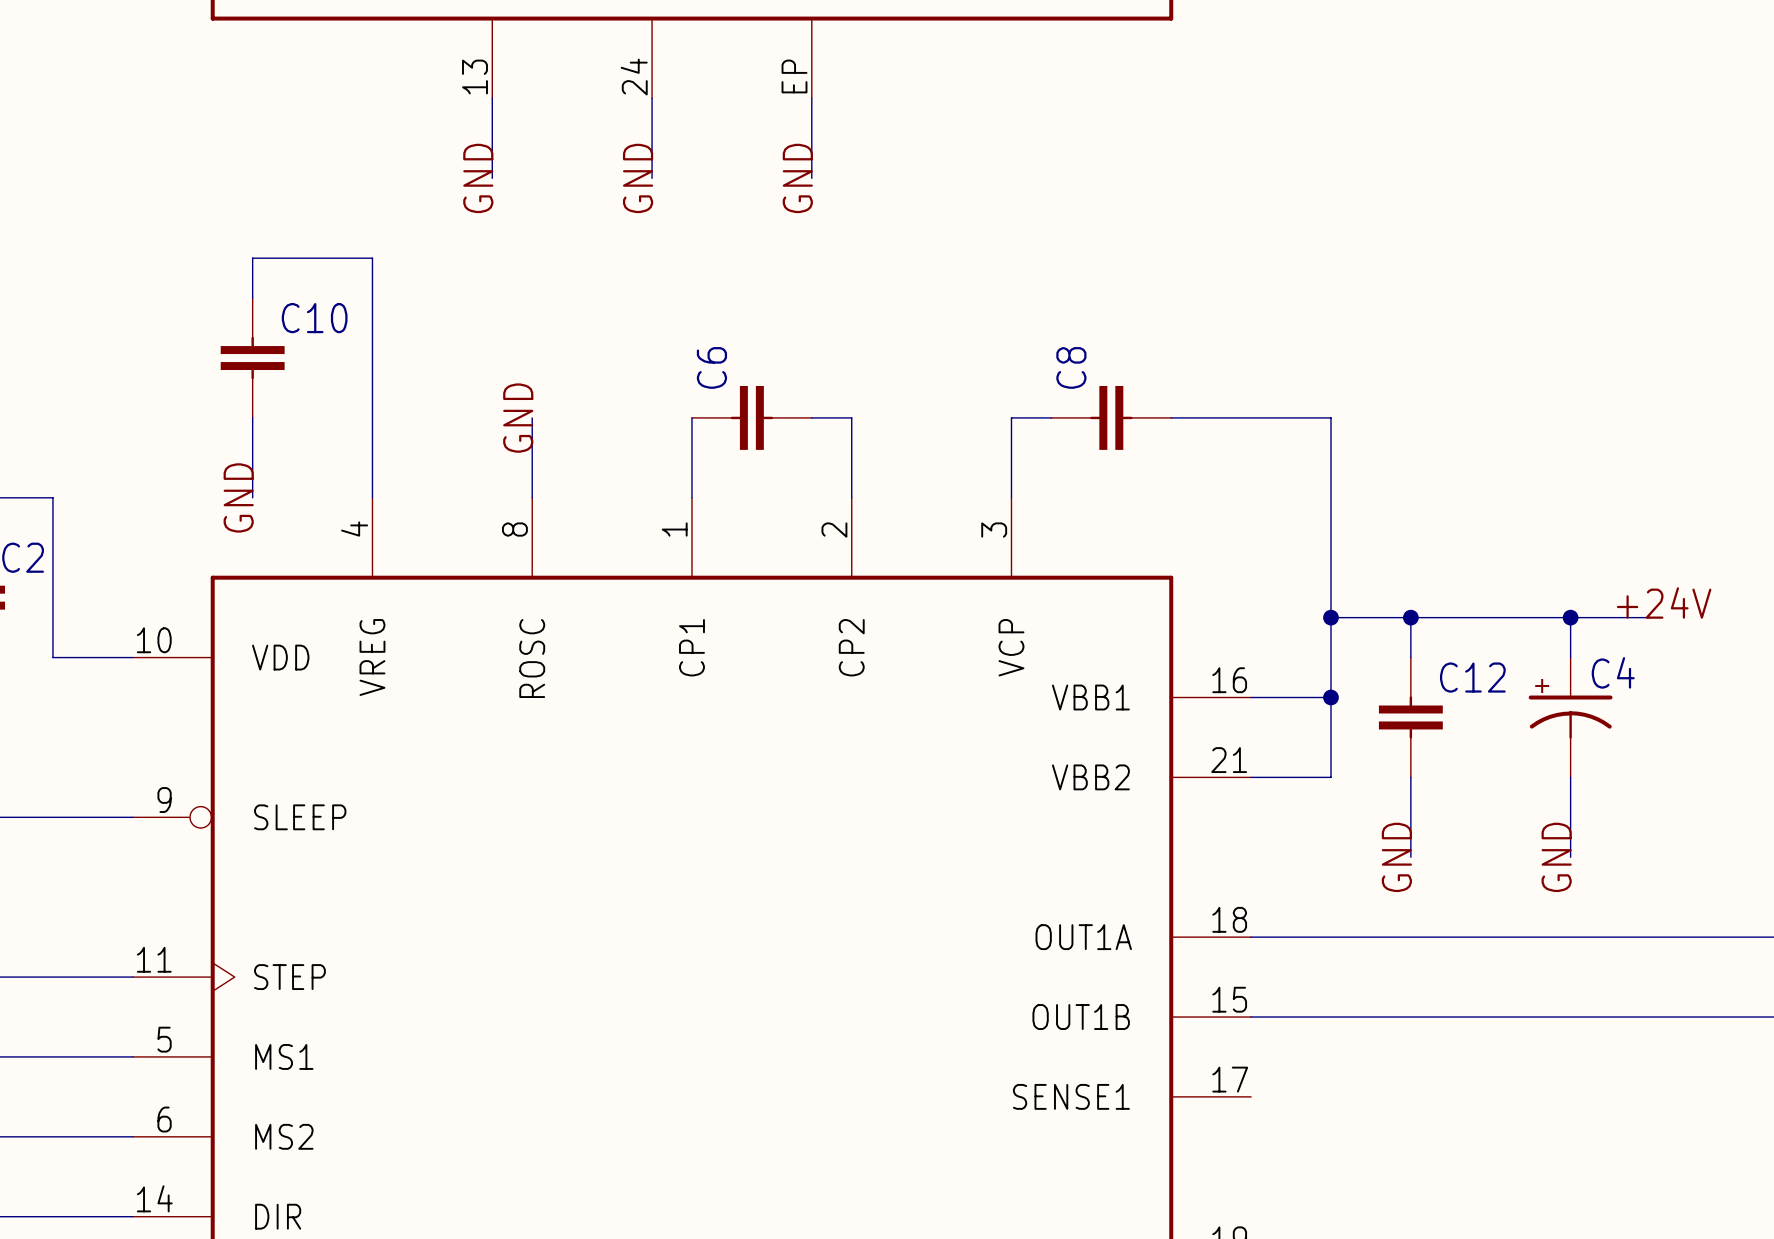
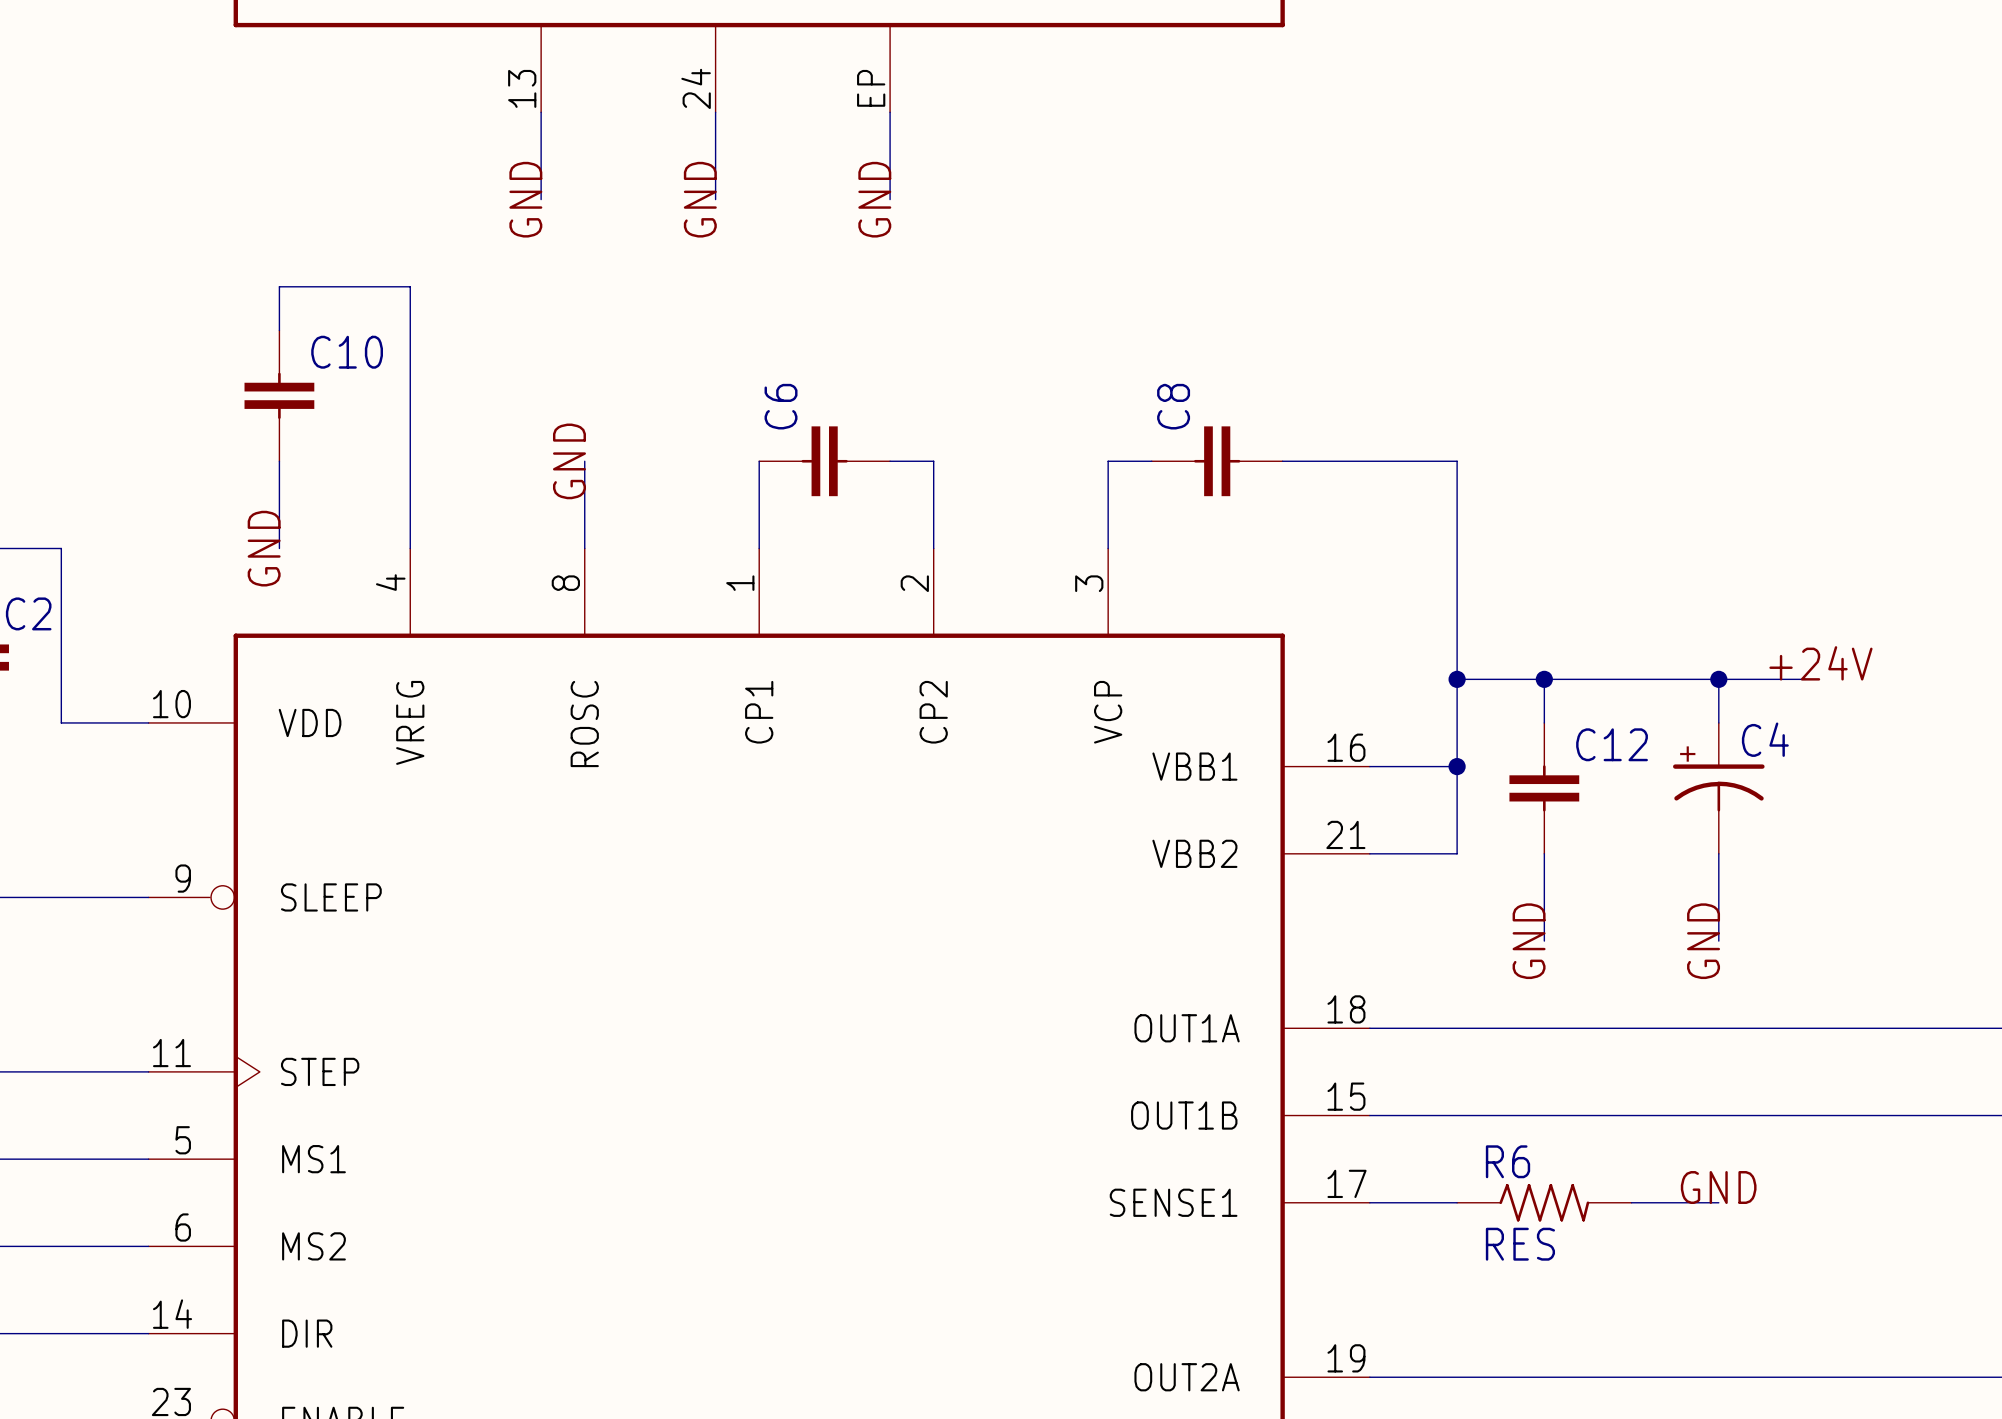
label: none -> GND (1718, 1187)
wire: none -> (1369, 1202) (1457, 1202)
R6: none -> RES (1544, 1202)
wire: none -> (1631, 1202) (1718, 1202)

